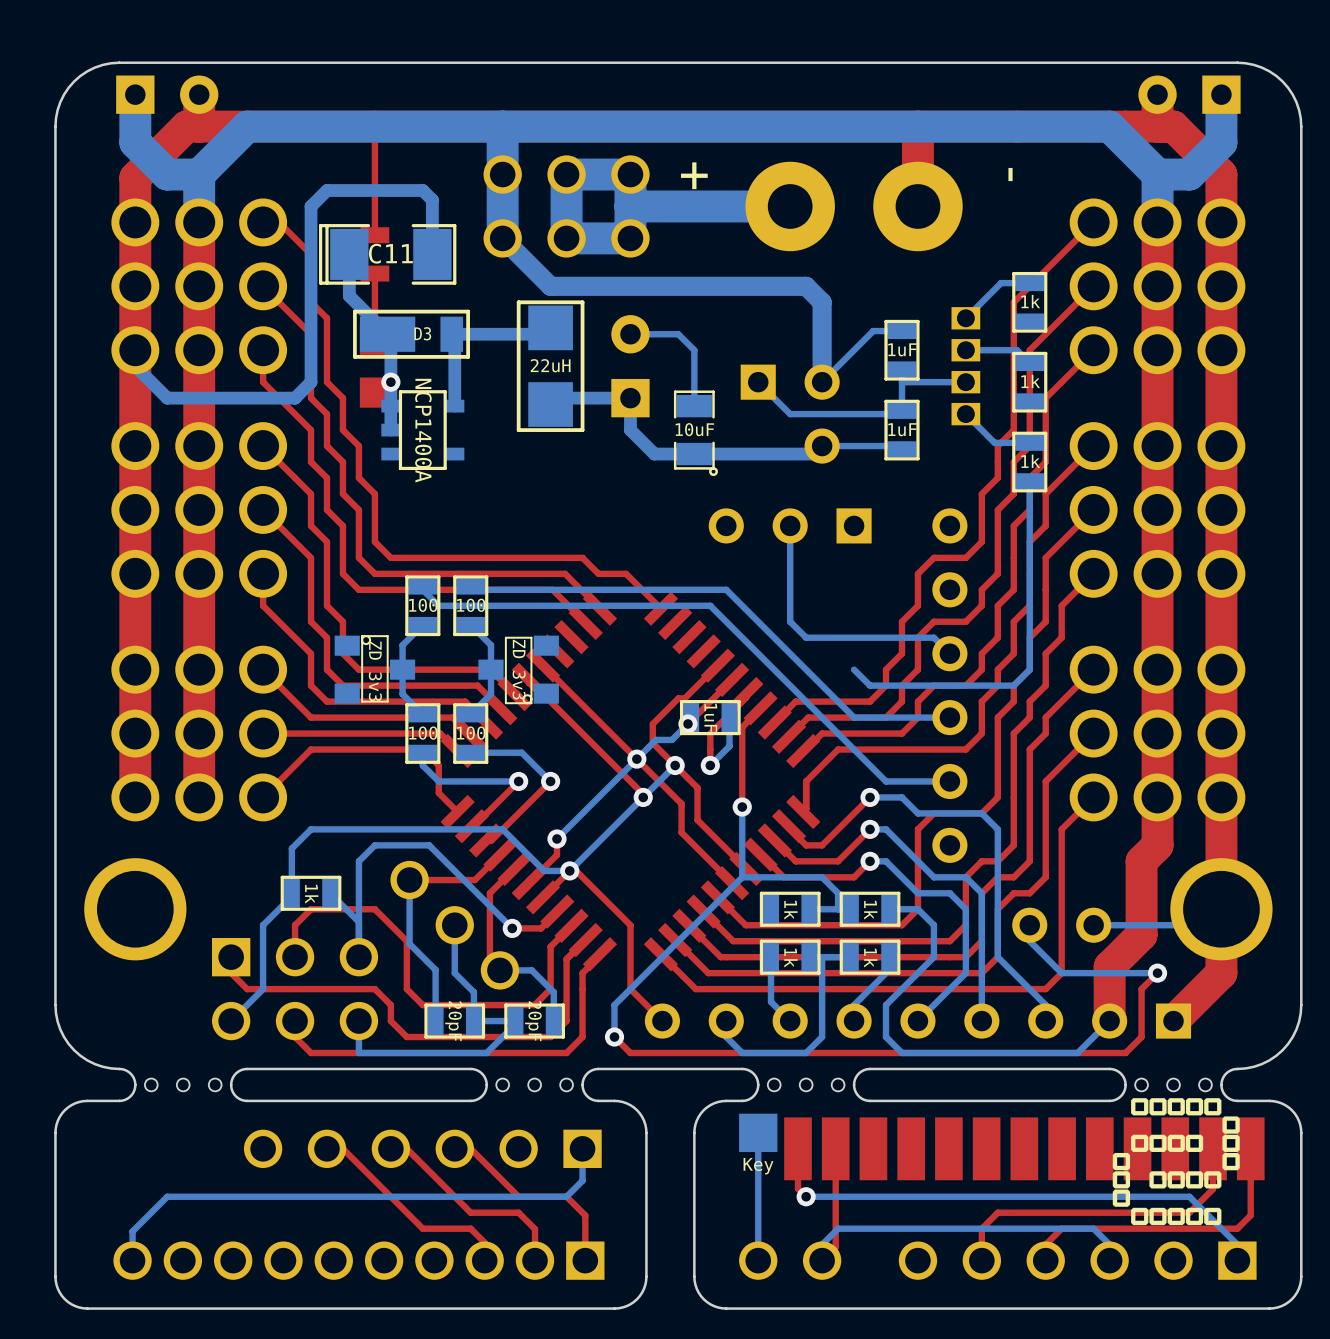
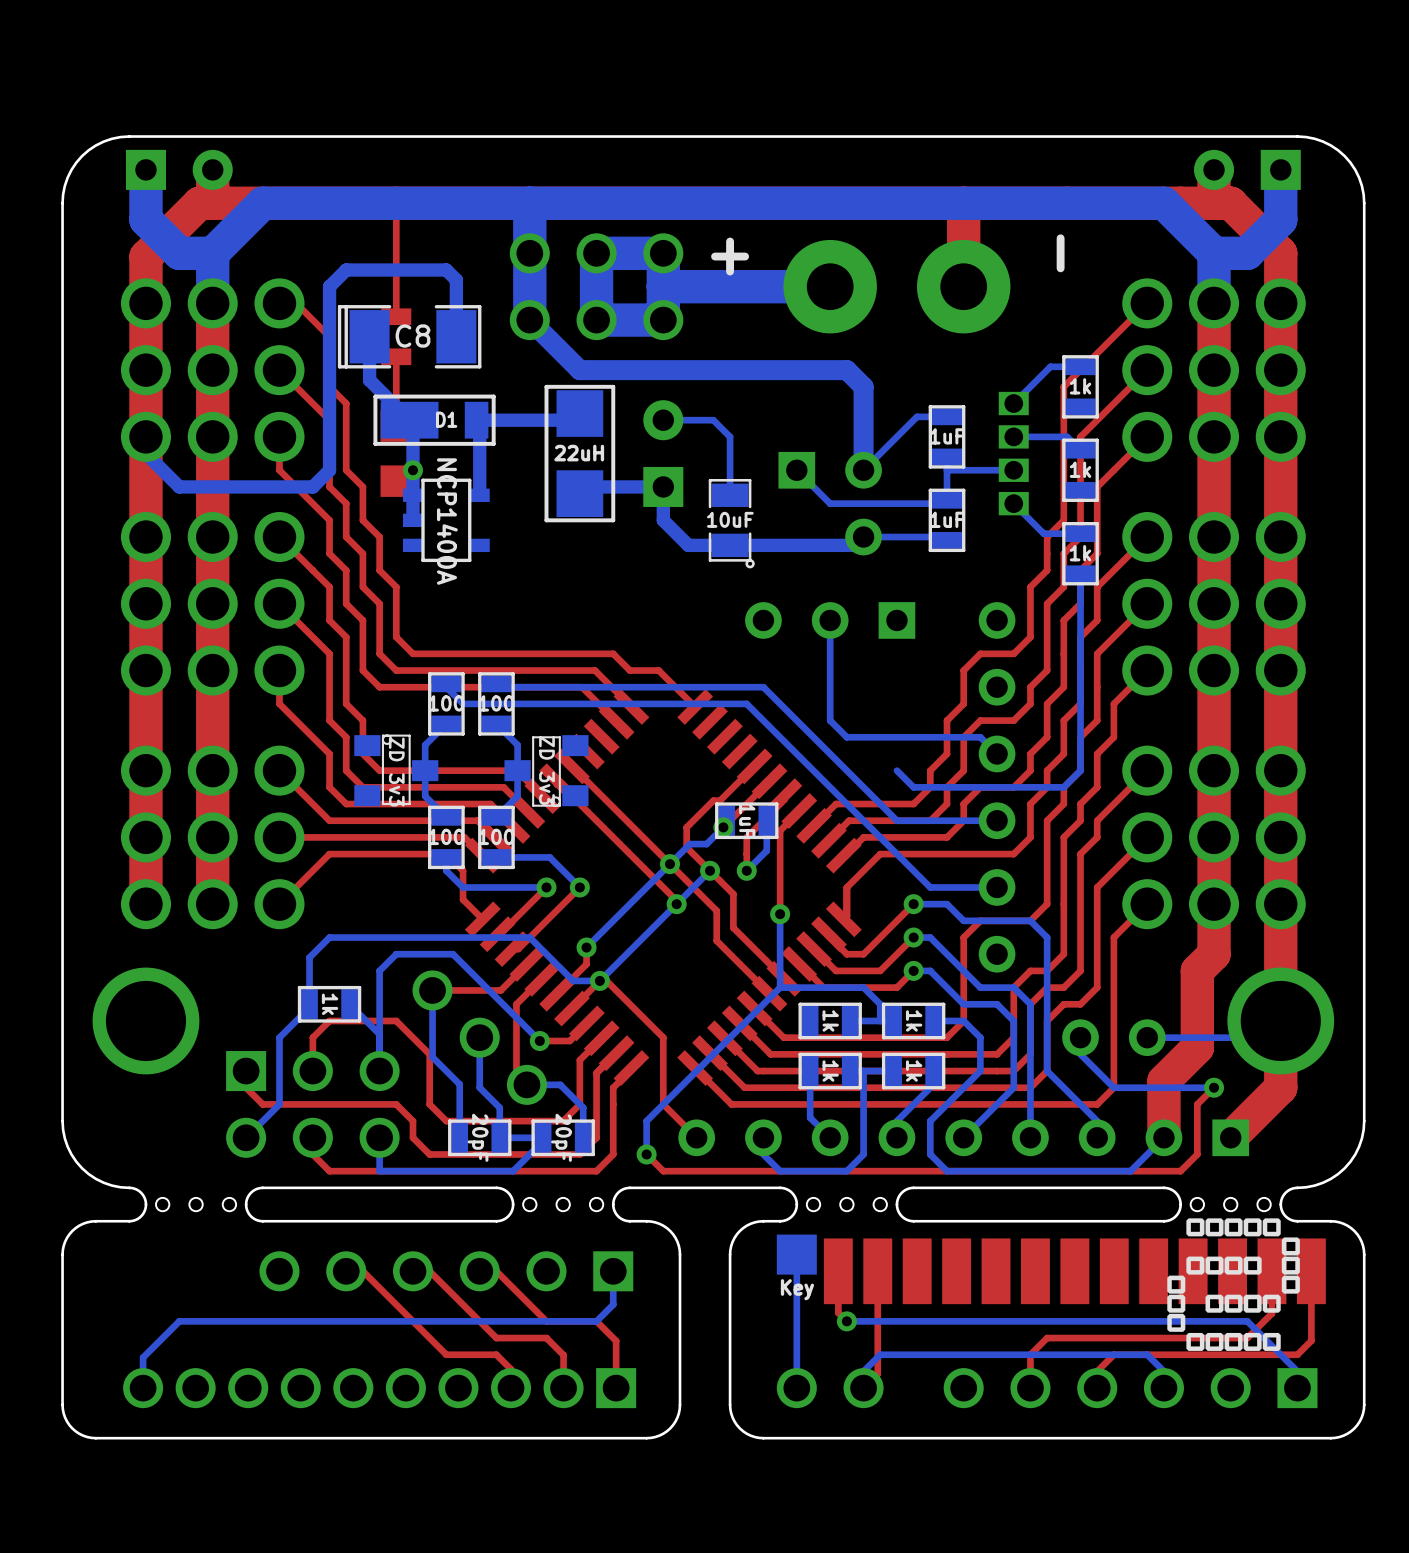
C11 name: C11 (390, 253) -> C8 (412, 336)
D3 name: D3 (422, 333) -> D1 (446, 419)

